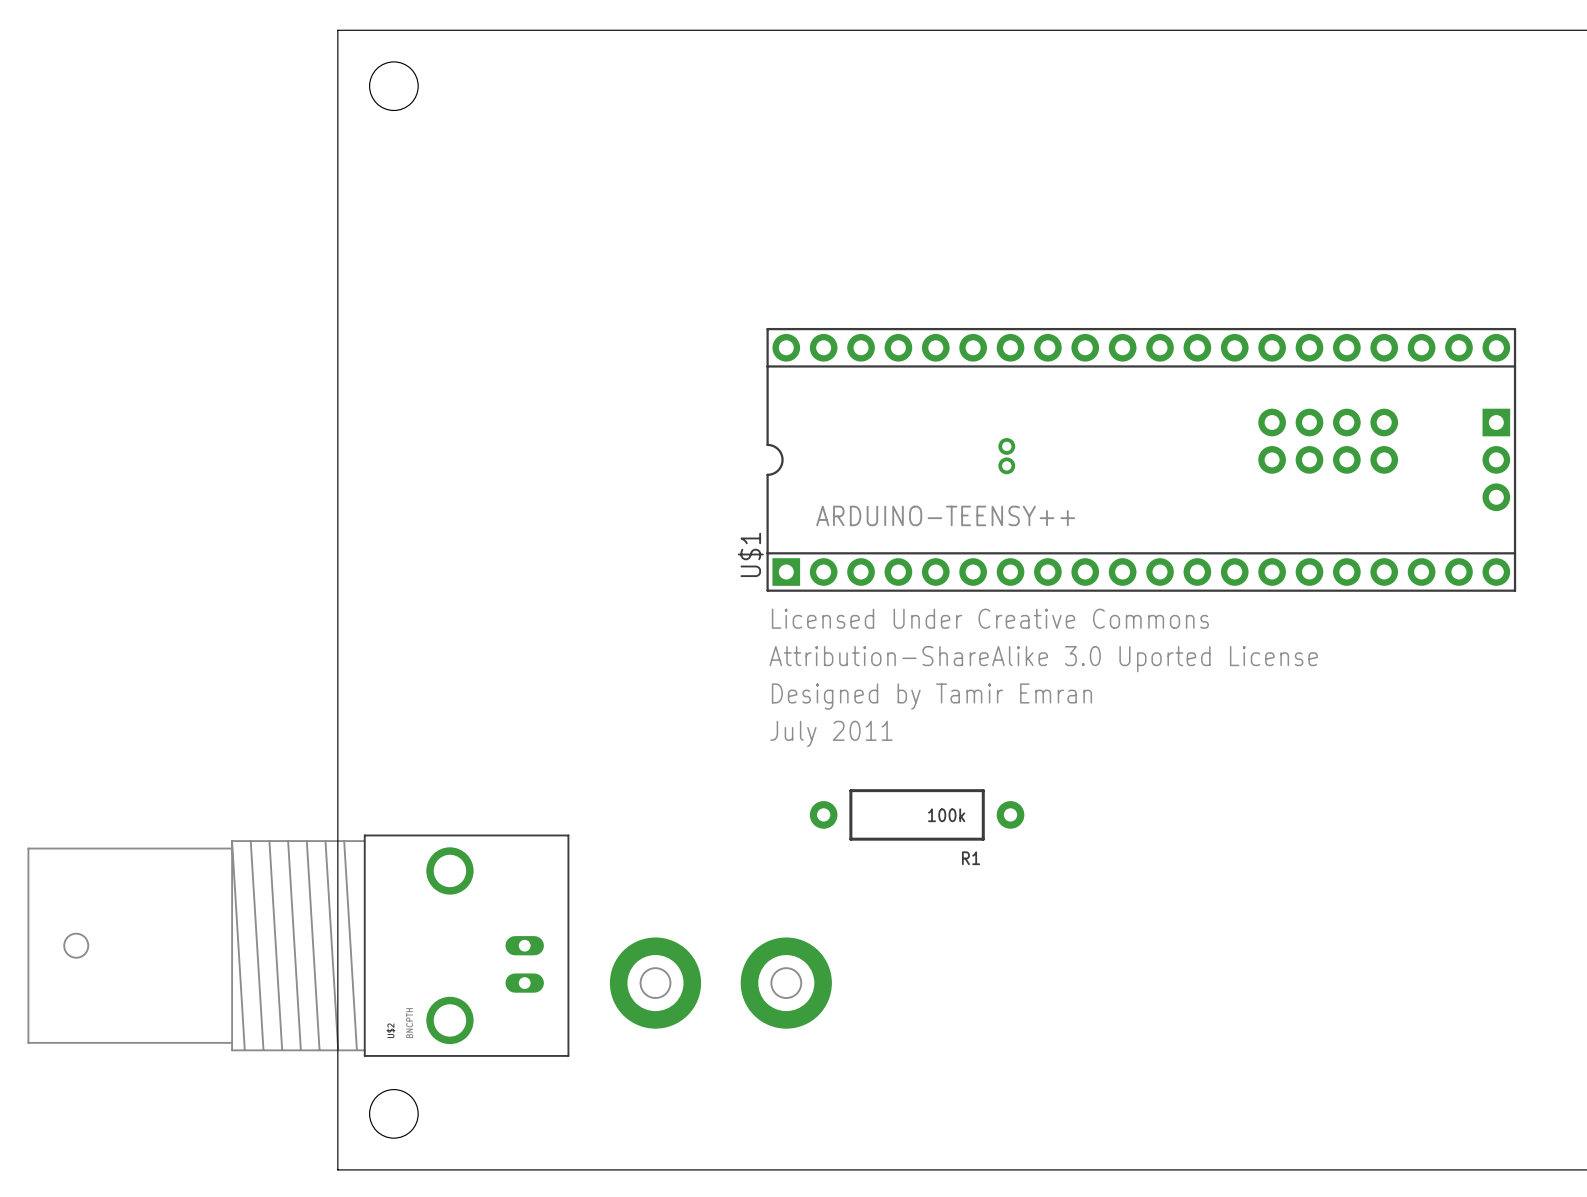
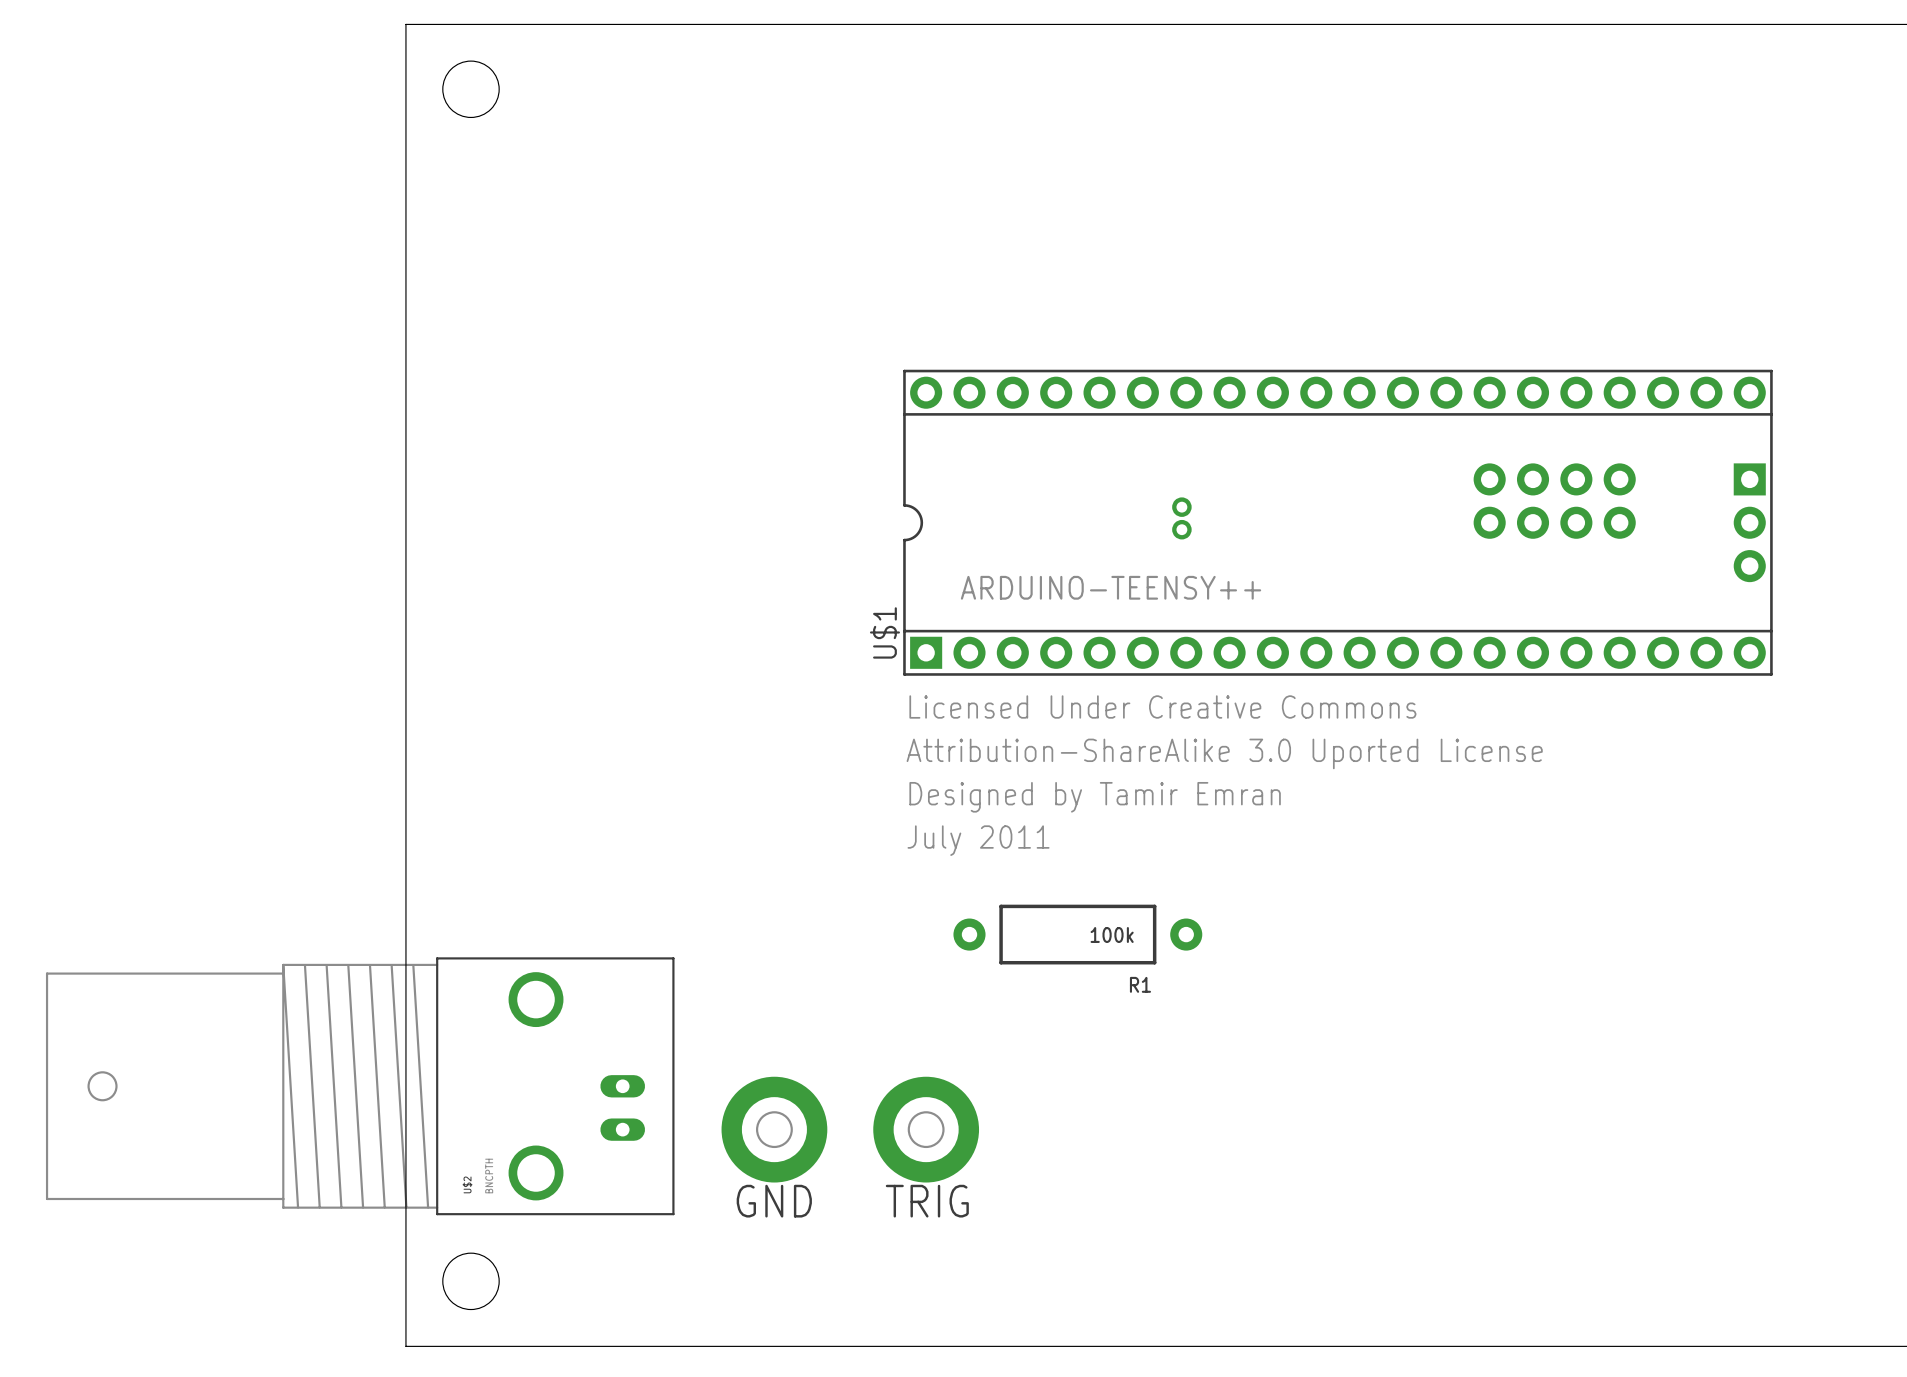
text: none -> GND (774, 1201)
text: none -> TRIG (927, 1201)

